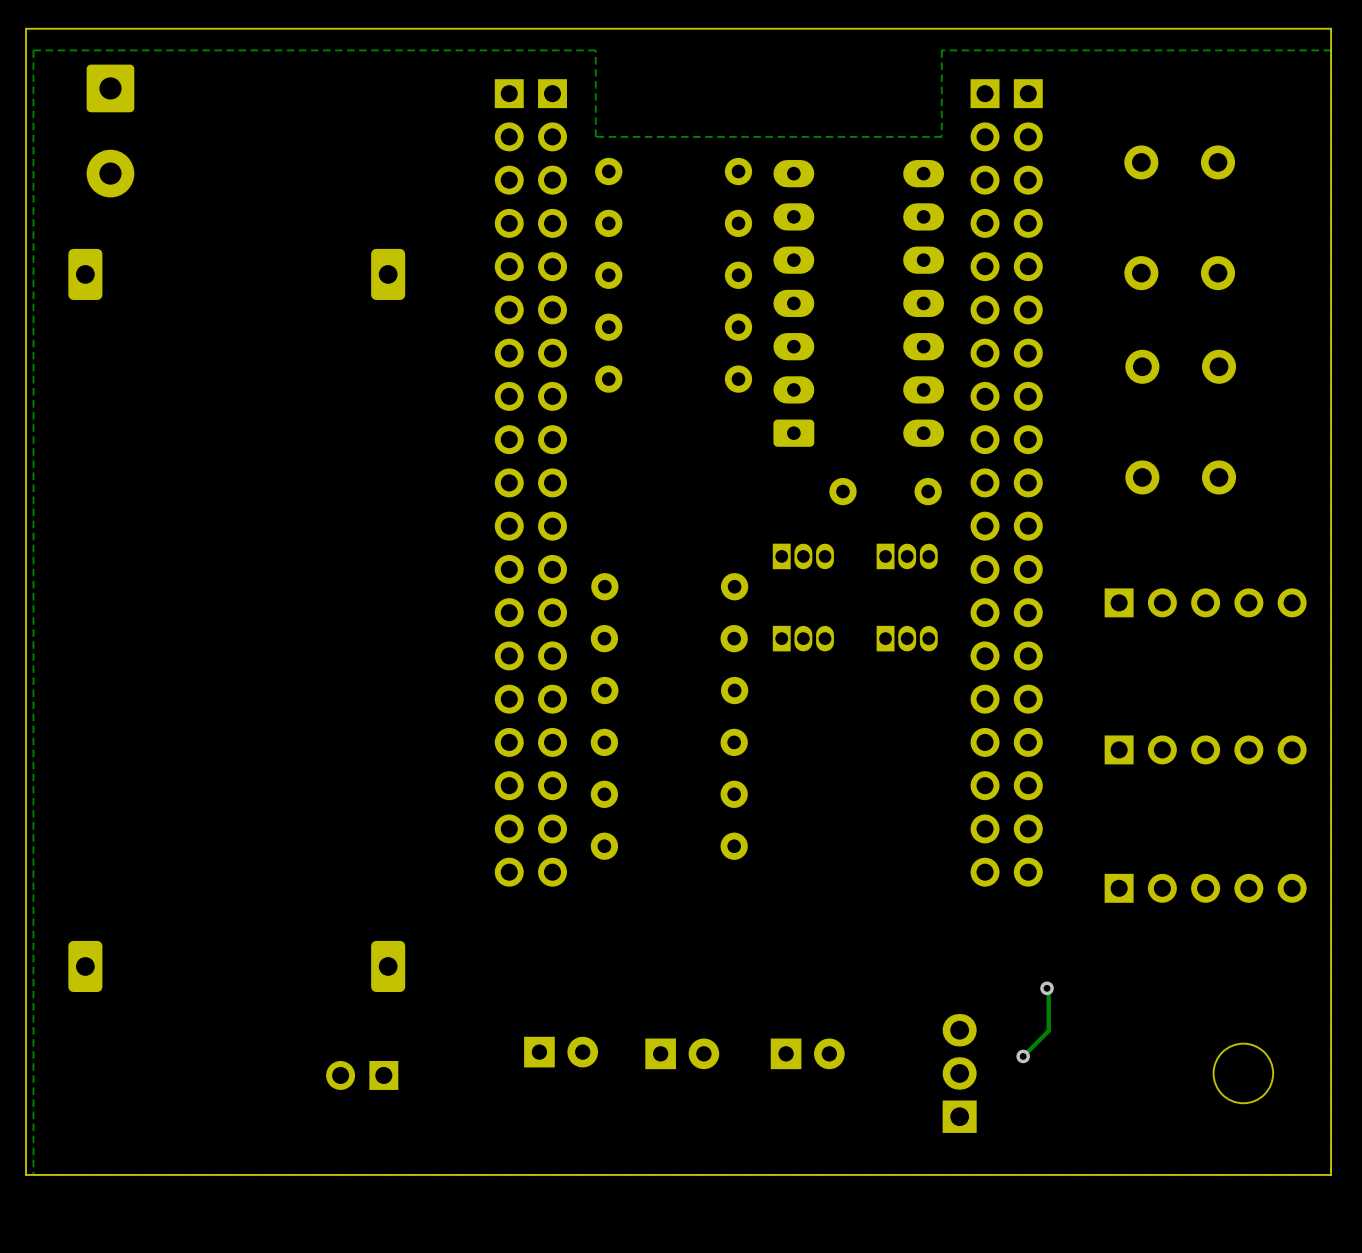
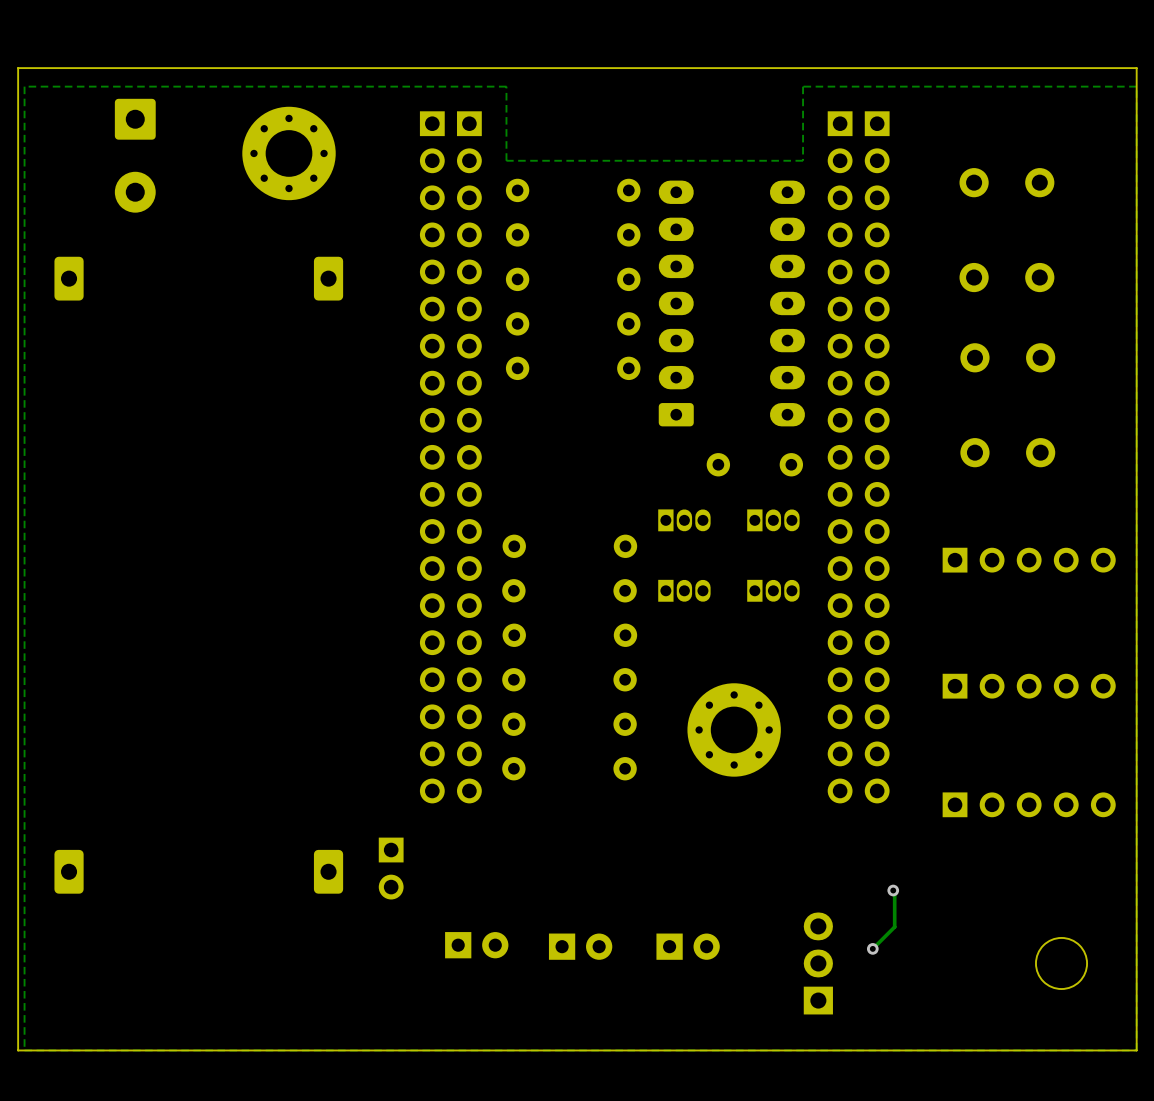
part: none -> (289, 153)
part position: (110, 131) -> (135, 155)
part: none -> (734, 729)
part rotation: 0° (362, 1075) -> 90° counterclockwise (391, 868)
part position: (362, 1075) -> (391, 868)

